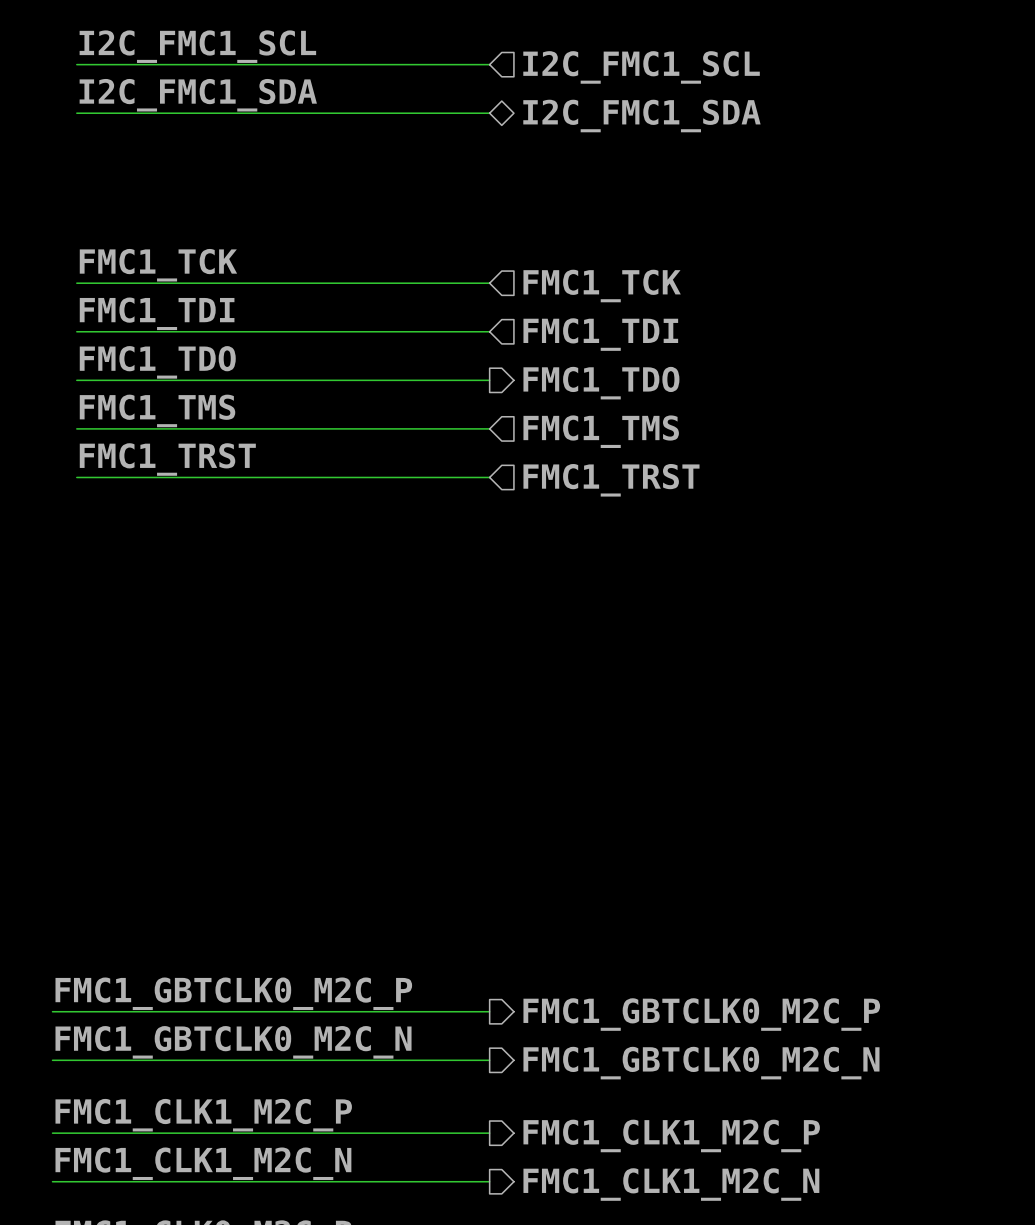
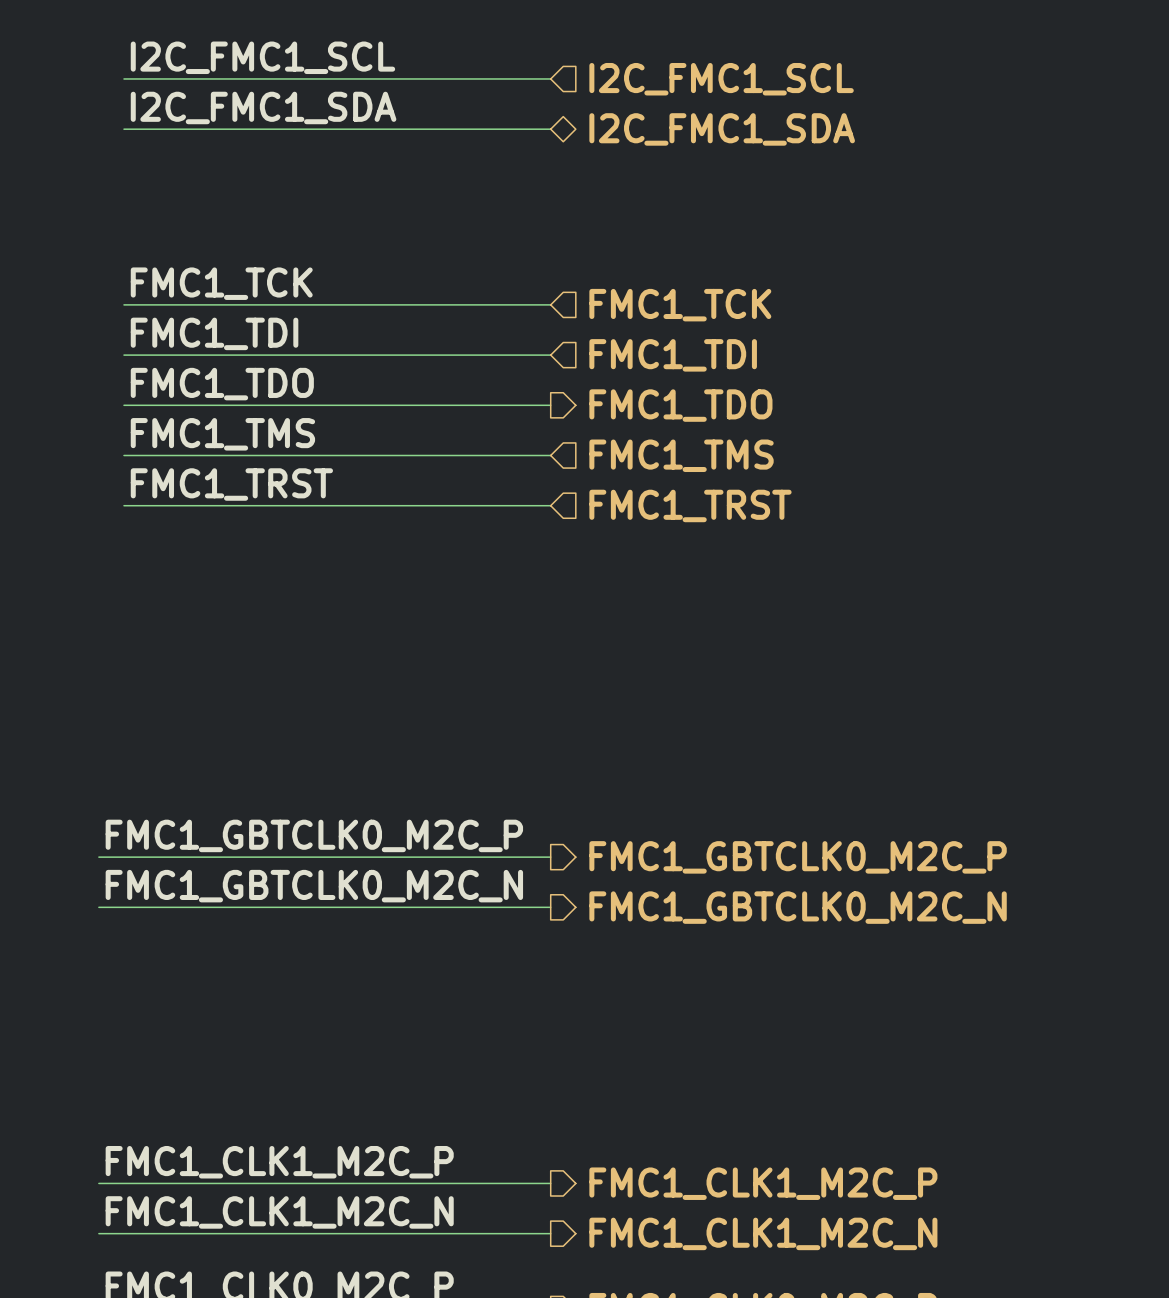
label position: FMC1_GBTCLK0_M2C_P (233, 993) -> FMC1_GBTCLK0_M2C_P (314, 835)
wire: (52, 1011) (489, 1011) -> (98, 907) (550, 907)
hierarchical label position: FMC1_GBTCLK0_M2C_P (701, 1014) -> FMC1_GBTCLK0_M2C_P (798, 857)
label position: FMC1_GBTCLK0_M2C_N (233, 1042) -> FMC1_GBTCLK0_M2C_N (314, 886)
wire: (52, 1060) (489, 1060) -> (98, 857) (550, 857)
hierarchical label position: FMC1_GBTCLK0_M2C_N (701, 1063) -> FMC1_GBTCLK0_M2C_N (798, 907)

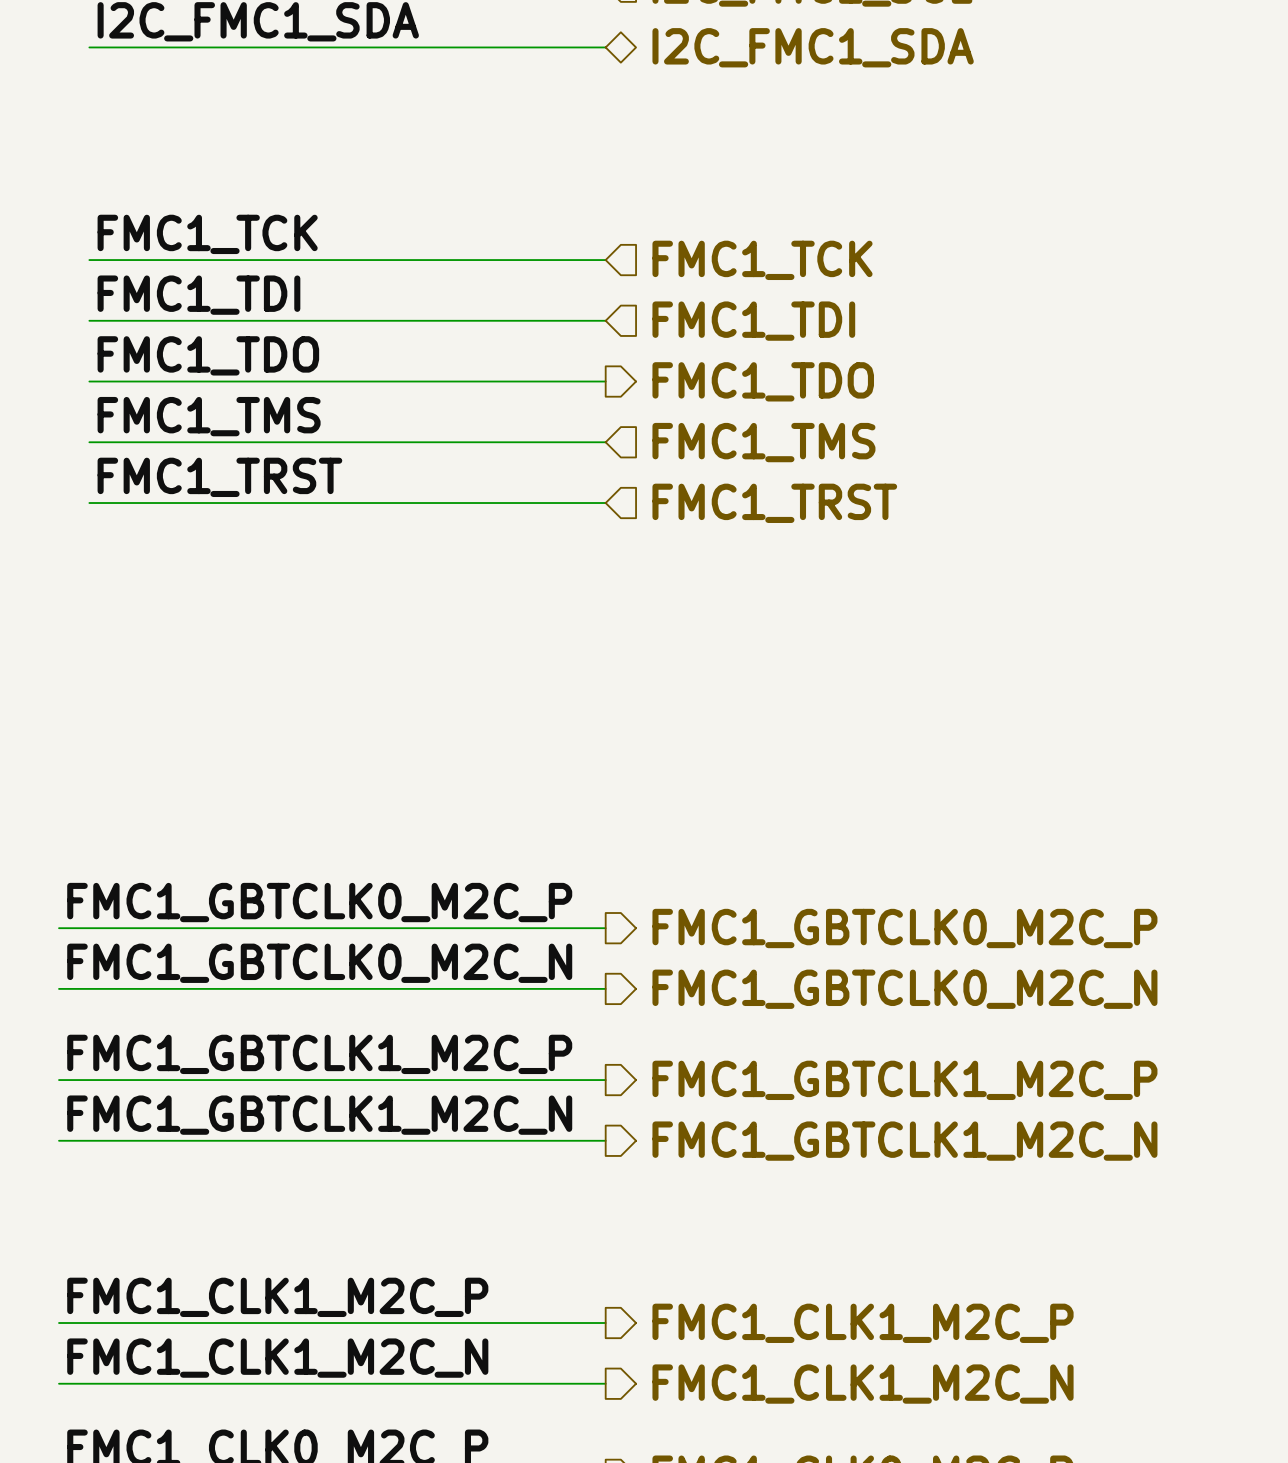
label: none -> FMC1_GBTCLK1_M2C_P (319, 1054)
wire: none -> (59, 1080) (605, 1080)
hierarchical label: none -> FMC1_GBTCLK1_M2C_P (904, 1080)
label: none -> FMC1_GBTCLK1_M2C_N (319, 1115)
wire: none -> (59, 1140) (605, 1140)
hierarchical label: none -> FMC1_GBTCLK1_M2C_N (904, 1141)

